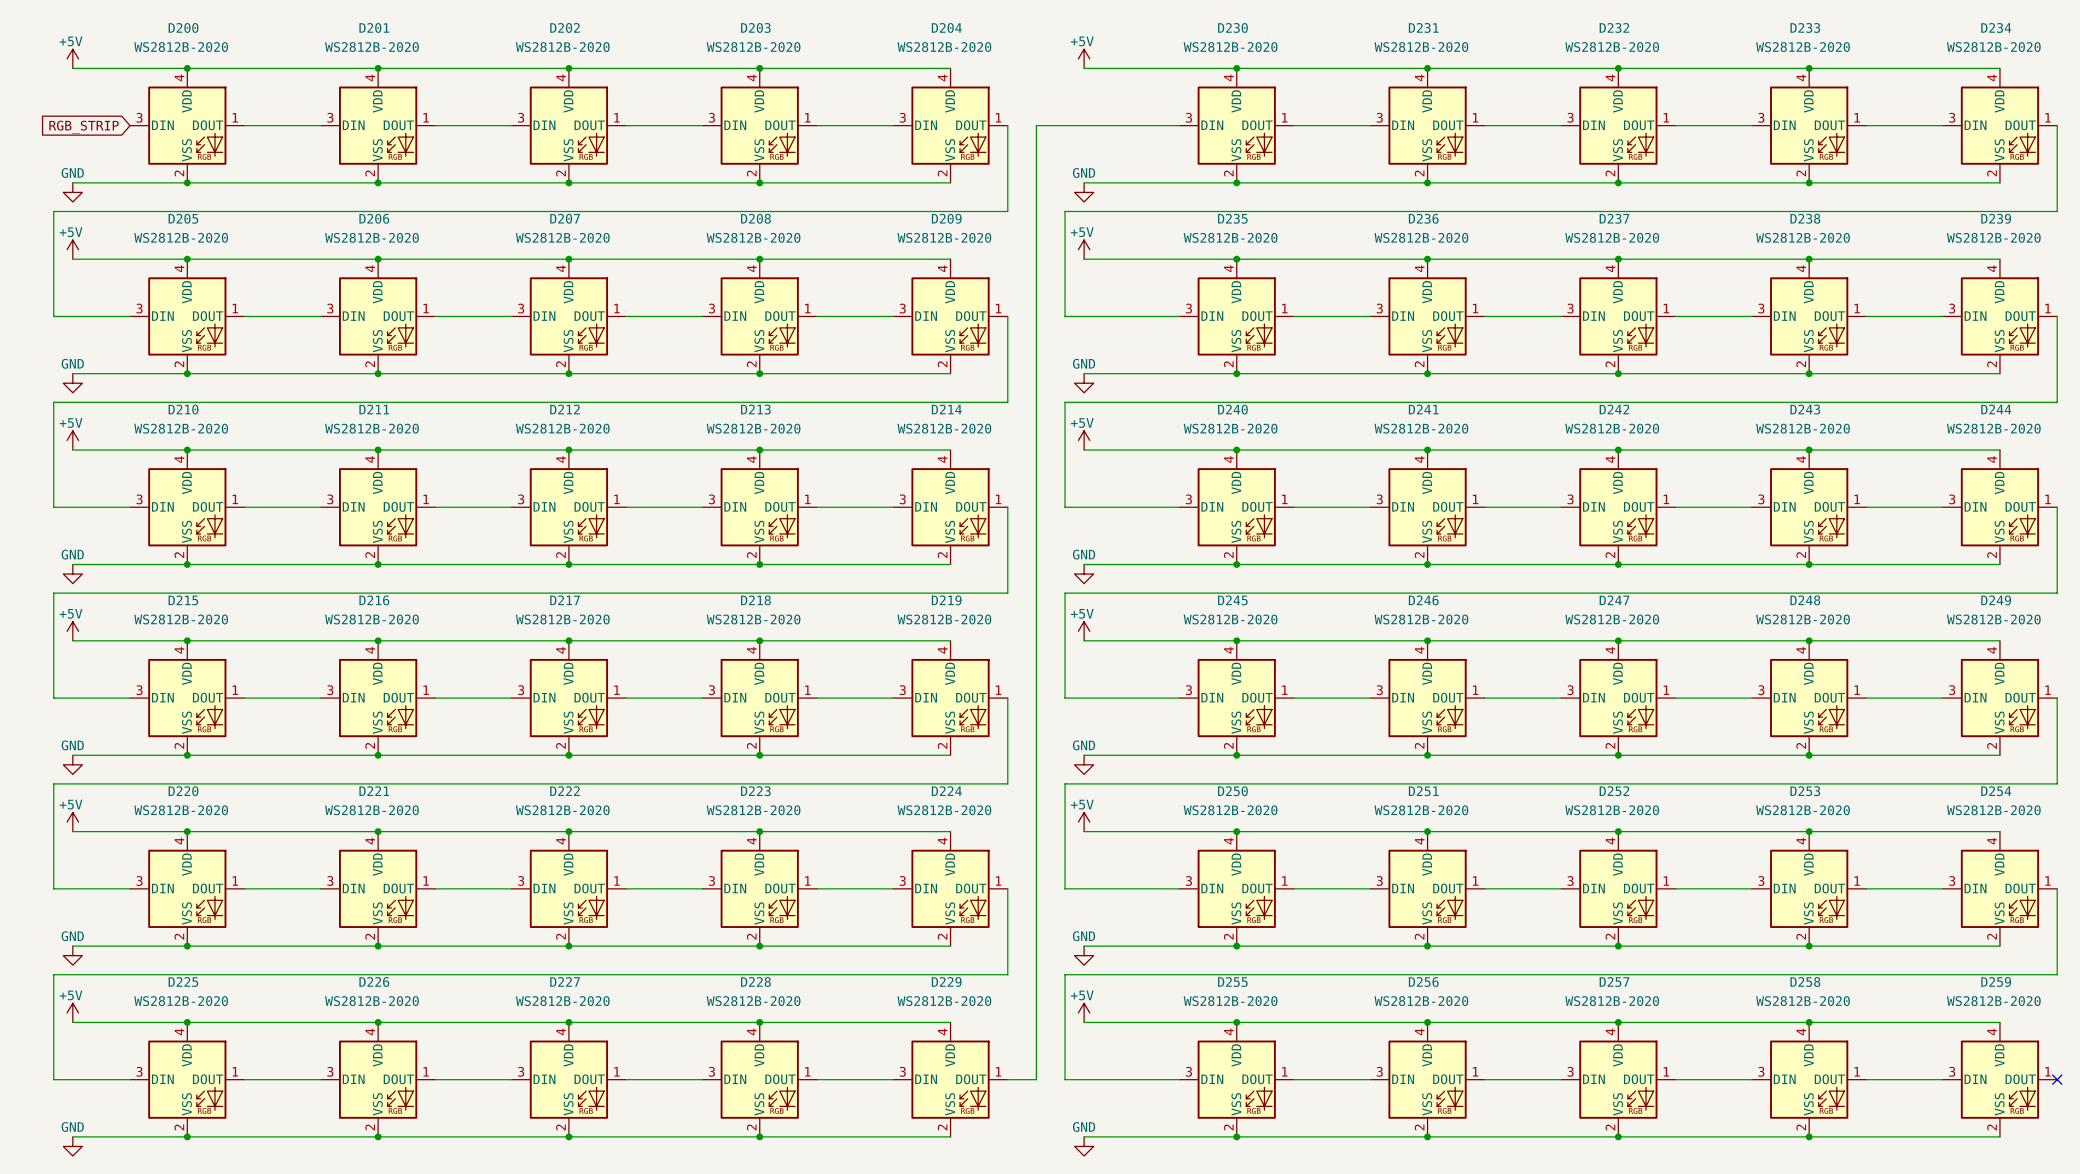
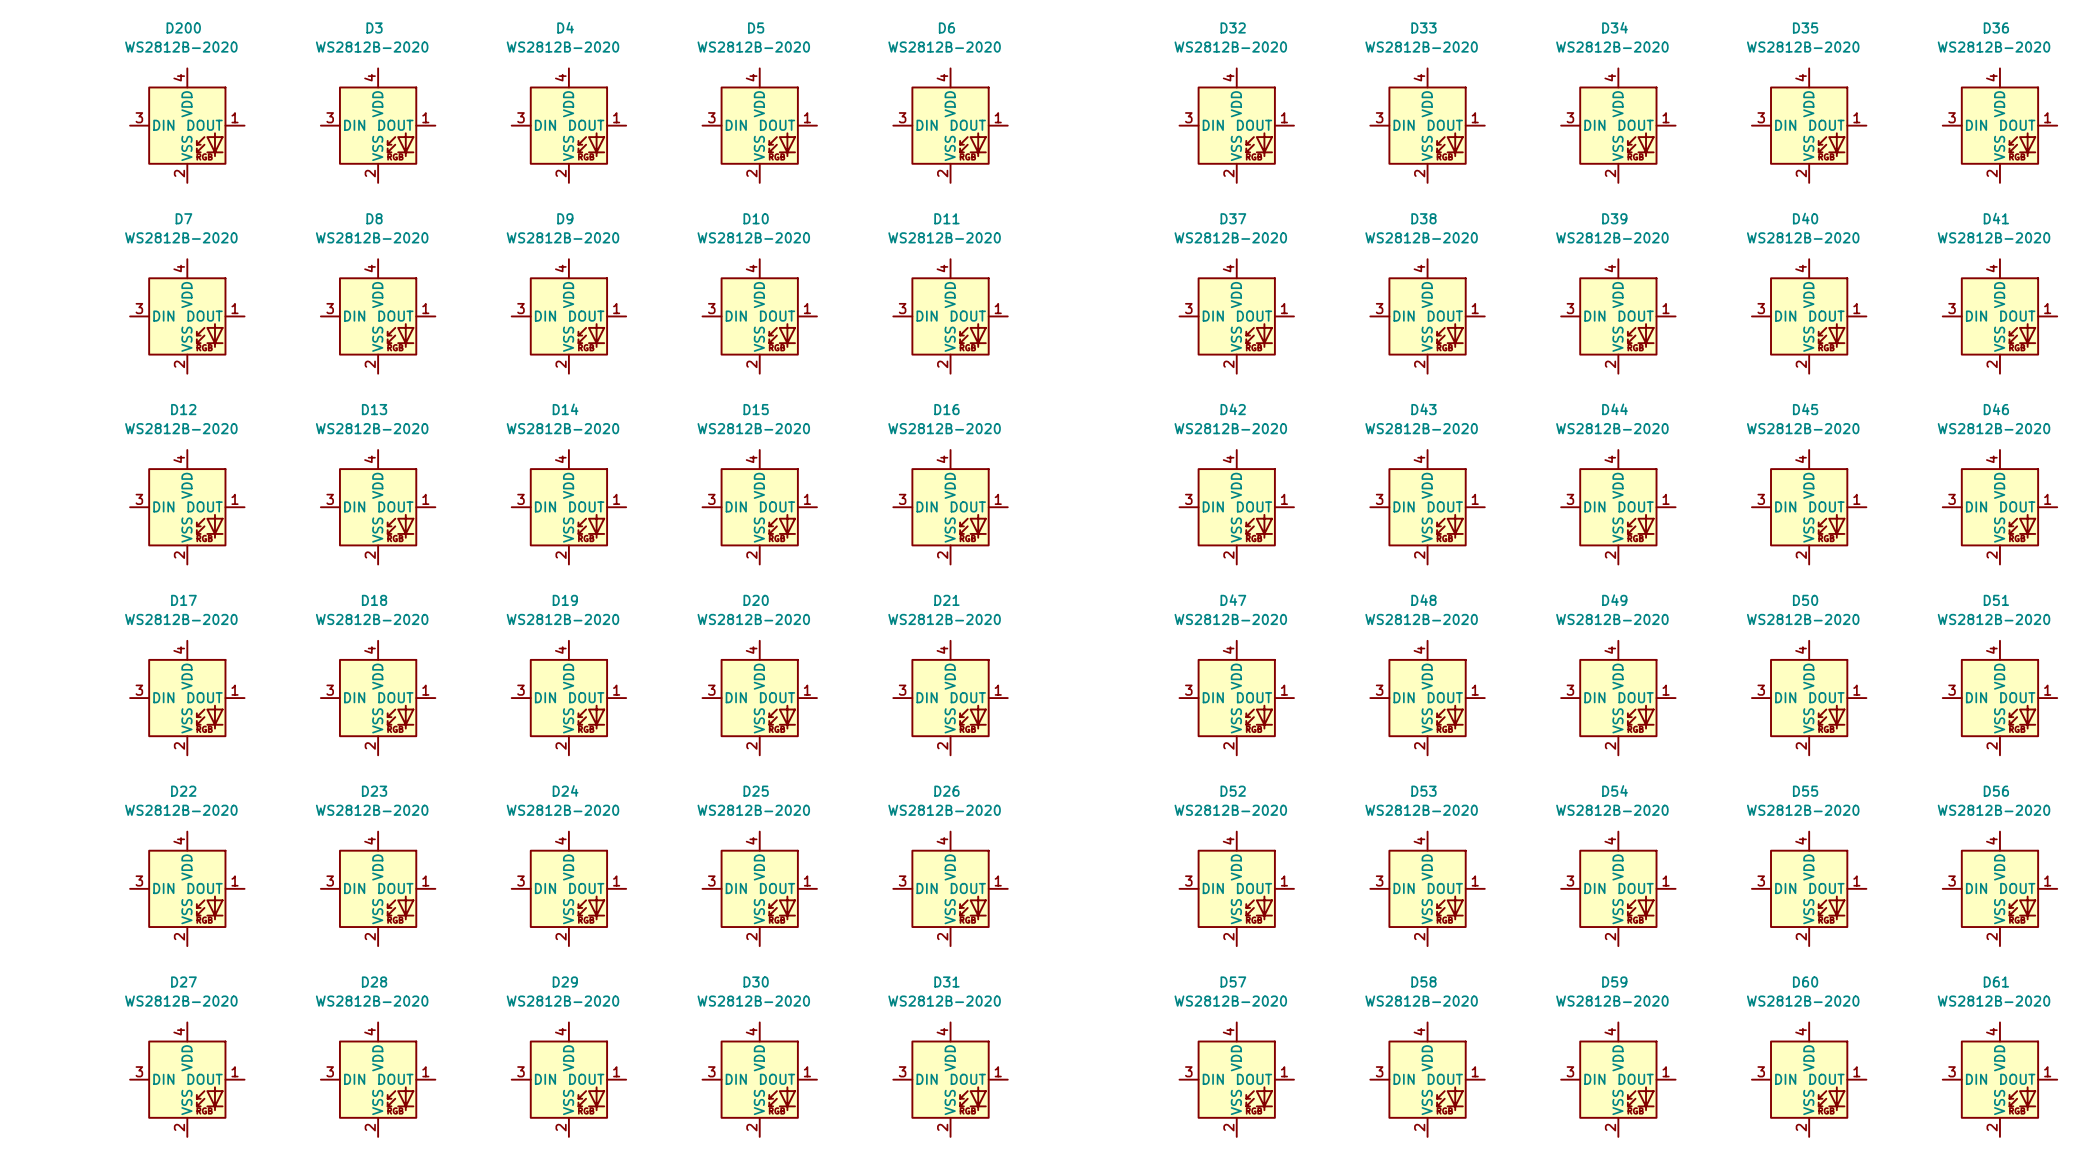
D201 name: D201 (374, 27) -> D3 (374, 27)
D202 name: D202 (564, 27) -> D4 (565, 27)
D203 name: D203 (755, 27) -> D5 (756, 27)
D204 name: D204 (946, 27) -> D6 (946, 27)
D230 name: D230 (1232, 27) -> D32 (1233, 27)
D231 name: D231 (1423, 27) -> D33 (1423, 27)
D232 name: D232 (1614, 27) -> D34 (1614, 27)
D233 name: D233 (1805, 27) -> D35 (1805, 27)
D234 name: D234 (1996, 27) -> D36 (1996, 27)
power symbol: +5V (72, 58) -> none
power symbol: +5V (1084, 58) -> none
wire: (72, 68) (950, 68) -> none
junction: (187, 68) -> none
junction: (378, 68) -> none
junction: (568, 68) -> none
junction: (759, 68) -> none
wire: (1084, 68) (1999, 68) -> none
junction: (1236, 68) -> none
junction: (1427, 68) -> none
junction: (1618, 68) -> none
junction: (1809, 68) -> none
wire: (244, 125) (320, 125) -> none
wire: (435, 125) (511, 125) -> none
wire: (626, 125) (702, 125) -> none
wire: (816, 125) (893, 125) -> none
wire: (1007, 125) (1007, 211) (53, 211) (53, 316) (130, 316) -> none
wire: (1179, 125) (1036, 125) (1036, 1079) (1007, 1079) -> none
wire: (1293, 125) (1370, 125) -> none
wire: (1484, 125) (1561, 125) -> none
wire: (1675, 125) (1751, 125) -> none
wire: (1866, 125) (1942, 125) -> none
wire: (2057, 125) (2057, 211) (1065, 211) (1065, 316) (1179, 316) -> none
global label: RGB_STRIP (84, 127) -> none
wire: (72, 182) (950, 182) -> none
junction: (187, 182) -> none
junction: (378, 182) -> none
junction: (568, 182) -> none
junction: (759, 182) -> none
wire: (1084, 182) (1999, 182) -> none
junction: (1236, 182) -> none
junction: (1427, 182) -> none
junction: (1618, 182) -> none
junction: (1809, 182) -> none
power symbol: GND (72, 192) -> none
power symbol: GND (1084, 192) -> none
D205 name: D205 (183, 218) -> D7 (183, 218)
D206 name: D206 (374, 218) -> D8 (374, 218)
D207 name: D207 (565, 218) -> D9 (565, 218)
D208 name: D208 (755, 218) -> D10 (756, 218)
D209 name: D209 (946, 218) -> D11 (946, 218)
D235 name: D235 (1232, 218) -> D37 (1233, 218)
D236 name: D236 (1423, 218) -> D38 (1423, 218)
D237 name: D237 (1614, 218) -> D39 (1614, 218)
D238 name: D238 (1805, 218) -> D40 (1805, 218)
D239 name: D239 (1996, 218) -> D41 (1996, 218)
power symbol: +5V (72, 249) -> none
power symbol: +5V (1084, 249) -> none
wire: (72, 259) (950, 259) -> none
junction: (187, 259) -> none
junction: (378, 259) -> none
junction: (568, 259) -> none
junction: (759, 259) -> none
wire: (1084, 259) (1999, 259) -> none
junction: (1236, 259) -> none
junction: (1427, 259) -> none
junction: (1618, 259) -> none
junction: (1809, 259) -> none
wire: (244, 316) (320, 316) -> none
wire: (435, 316) (511, 316) -> none
wire: (626, 316) (702, 316) -> none
wire: (816, 316) (893, 316) -> none
wire: (1007, 316) (1007, 402) (53, 402) (53, 507) (130, 507) -> none
wire: (1293, 316) (1370, 316) -> none
wire: (1484, 316) (1561, 316) -> none
wire: (1675, 316) (1751, 316) -> none
wire: (1866, 316) (1942, 316) -> none
wire: (2057, 316) (2057, 402) (1065, 402) (1065, 507) (1179, 507) -> none
wire: (72, 373) (950, 373) -> none
junction: (187, 373) -> none
junction: (378, 373) -> none
junction: (568, 373) -> none
junction: (759, 373) -> none
wire: (1084, 373) (1999, 373) -> none
junction: (1236, 373) -> none
junction: (1427, 373) -> none
junction: (1618, 373) -> none
junction: (1809, 373) -> none
power symbol: GND (72, 383) -> none
power symbol: GND (1084, 383) -> none
D210 name: D210 (183, 409) -> D12 (183, 409)
D211 name: D211 (374, 409) -> D13 (374, 409)
D212 name: D212 (564, 409) -> D14 (565, 409)
D213 name: D213 (755, 409) -> D15 (756, 409)
D214 name: D214 (946, 409) -> D16 (946, 409)
D240 name: D240 (1232, 409) -> D42 (1233, 409)
D241 name: D241 (1423, 409) -> D43 (1423, 409)
D242 name: D242 (1614, 409) -> D44 (1614, 409)
D243 name: D243 (1805, 409) -> D45 (1805, 409)
D244 name: D244 (1996, 409) -> D46 (1996, 409)
power symbol: +5V (72, 440) -> none
power symbol: +5V (1084, 440) -> none
wire: (72, 450) (950, 450) -> none
junction: (187, 450) -> none
junction: (378, 450) -> none
junction: (568, 450) -> none
junction: (759, 450) -> none
wire: (1084, 450) (1999, 450) -> none
junction: (1236, 450) -> none
junction: (1427, 450) -> none
junction: (1618, 450) -> none
junction: (1809, 450) -> none
wire: (244, 507) (320, 507) -> none
wire: (435, 507) (511, 507) -> none
wire: (626, 507) (702, 507) -> none
wire: (816, 507) (893, 507) -> none
wire: (1007, 507) (1007, 593) (53, 593) (53, 698) (130, 698) -> none
wire: (1293, 507) (1370, 507) -> none
wire: (1484, 507) (1561, 507) -> none
wire: (1675, 507) (1751, 507) -> none
wire: (1866, 507) (1942, 507) -> none
wire: (2057, 507) (2057, 593) (1065, 593) (1065, 698) (1179, 698) -> none
wire: (72, 564) (950, 564) -> none
junction: (187, 564) -> none
junction: (378, 564) -> none
junction: (568, 564) -> none
junction: (759, 564) -> none
wire: (1084, 564) (1999, 564) -> none
junction: (1236, 564) -> none
junction: (1427, 564) -> none
junction: (1618, 564) -> none
junction: (1809, 564) -> none
power symbol: GND (72, 574) -> none
power symbol: GND (1084, 574) -> none
D215 name: D215 (183, 600) -> D17 (183, 600)
D216 name: D216 (374, 600) -> D18 (374, 600)
D217 name: D217 (565, 600) -> D19 (565, 600)
D218 name: D218 (755, 600) -> D20 (756, 600)
D219 name: D219 (946, 600) -> D21 (946, 600)
D245 name: D245 (1232, 600) -> D47 (1233, 600)
D246 name: D246 (1423, 600) -> D48 (1423, 600)
D247 name: D247 (1614, 600) -> D49 (1614, 600)
D248 name: D248 (1805, 600) -> D50 (1805, 600)
D249 name: D249 (1996, 600) -> D51 (1996, 600)
power symbol: +5V (72, 631) -> none
power symbol: +5V (1084, 631) -> none
wire: (72, 640) (950, 640) -> none
junction: (187, 640) -> none
junction: (378, 640) -> none
junction: (568, 640) -> none
junction: (759, 640) -> none
wire: (1084, 640) (1999, 640) -> none
junction: (1236, 640) -> none
junction: (1427, 640) -> none
junction: (1618, 640) -> none
junction: (1809, 640) -> none
wire: (244, 698) (320, 698) -> none
wire: (435, 698) (511, 698) -> none
wire: (626, 698) (702, 698) -> none
wire: (816, 698) (893, 698) -> none
wire: (1007, 698) (1007, 783) (53, 783) (53, 888) (130, 888) -> none
wire: (1293, 698) (1370, 698) -> none
wire: (1484, 698) (1561, 698) -> none
wire: (1675, 698) (1751, 698) -> none
wire: (1866, 698) (1942, 698) -> none
wire: (2057, 698) (2057, 783) (1065, 783) (1065, 888) (1179, 888) -> none
wire: (72, 755) (950, 755) -> none
junction: (187, 755) -> none
junction: (378, 755) -> none
junction: (568, 755) -> none
junction: (759, 755) -> none
wire: (1084, 755) (1999, 755) -> none
junction: (1236, 755) -> none
junction: (1427, 755) -> none
junction: (1618, 755) -> none
junction: (1809, 755) -> none
power symbol: GND (72, 764) -> none
power symbol: GND (1084, 764) -> none
D220 name: D220 (183, 791) -> D22 (183, 791)
D221 name: D221 (374, 791) -> D23 (374, 791)
D222 name: D222 (564, 791) -> D24 (565, 790)
D223 name: D223 (755, 791) -> D25 (756, 791)
D224 name: D224 (946, 791) -> D26 (946, 791)
D250 name: D250 (1232, 791) -> D52 (1233, 791)
D251 name: D251 (1423, 791) -> D53 (1423, 791)
D252 name: D252 (1614, 791) -> D54 (1614, 790)
D253 name: D253 (1805, 791) -> D55 (1805, 791)
D254 name: D254 (1996, 791) -> D56 (1996, 791)
power symbol: +5V (72, 822) -> none
power symbol: +5V (1084, 822) -> none
wire: (72, 831) (950, 831) -> none
junction: (187, 831) -> none
junction: (378, 831) -> none
junction: (568, 831) -> none
junction: (759, 831) -> none
wire: (1084, 831) (1999, 831) -> none
junction: (1236, 831) -> none
junction: (1427, 831) -> none
junction: (1618, 831) -> none
junction: (1809, 831) -> none
wire: (244, 888) (320, 888) -> none
wire: (435, 888) (511, 888) -> none
wire: (626, 888) (702, 888) -> none
wire: (816, 888) (893, 888) -> none
wire: (1007, 888) (1007, 974) (53, 974) (53, 1079) (130, 1079) -> none
wire: (1293, 888) (1370, 888) -> none
wire: (1484, 888) (1561, 888) -> none
wire: (1675, 888) (1751, 888) -> none
wire: (1866, 888) (1942, 888) -> none
wire: (2057, 888) (2057, 974) (1065, 974) (1065, 1079) (1179, 1079) -> none
wire: (72, 946) (950, 946) -> none
junction: (187, 946) -> none
junction: (378, 946) -> none
junction: (568, 946) -> none
junction: (759, 946) -> none
wire: (1084, 946) (1999, 946) -> none
junction: (1236, 946) -> none
junction: (1427, 946) -> none
junction: (1618, 946) -> none
junction: (1809, 946) -> none
power symbol: GND (72, 955) -> none
power symbol: GND (1084, 955) -> none
D227 name: D227 (565, 981) -> D29 (565, 982)
D225 name: D225 (183, 982) -> D27 (183, 982)
D226 name: D226 (374, 982) -> D28 (374, 982)
D228 name: D228 (755, 982) -> D30 (756, 982)
D229 name: D229 (946, 982) -> D31 (946, 982)
D255 name: D255 (1232, 982) -> D57 (1233, 982)
D256 name: D256 (1423, 982) -> D58 (1423, 982)
D257 name: D257 (1614, 982) -> D59 (1614, 982)
D258 name: D258 (1805, 982) -> D60 (1805, 982)
D259 name: D259 (1996, 982) -> D61 (1996, 982)
power symbol: +5V (72, 1012) -> none
power symbol: +5V (1084, 1012) -> none
wire: (72, 1022) (950, 1022) -> none
junction: (187, 1022) -> none
junction: (378, 1022) -> none
junction: (568, 1022) -> none
junction: (759, 1022) -> none
wire: (1084, 1022) (1999, 1022) -> none
junction: (1236, 1022) -> none
junction: (1427, 1022) -> none
junction: (1618, 1022) -> none
junction: (1809, 1022) -> none
wire: (244, 1079) (320, 1079) -> none
wire: (435, 1079) (511, 1079) -> none
wire: (626, 1079) (702, 1079) -> none
wire: (816, 1079) (893, 1079) -> none
wire: (1293, 1079) (1370, 1079) -> none
wire: (1484, 1079) (1561, 1079) -> none
wire: (1675, 1079) (1751, 1079) -> none
wire: (1866, 1079) (1942, 1079) -> none
no-connect mark: (2057, 1079) -> none
wire: (72, 1136) (950, 1136) -> none
junction: (187, 1136) -> none
junction: (378, 1136) -> none
junction: (568, 1136) -> none
junction: (759, 1136) -> none
wire: (1084, 1136) (1999, 1136) -> none
junction: (1236, 1136) -> none
junction: (1427, 1136) -> none
junction: (1618, 1136) -> none
junction: (1809, 1136) -> none
power symbol: GND (72, 1146) -> none
power symbol: GND (1084, 1146) -> none

